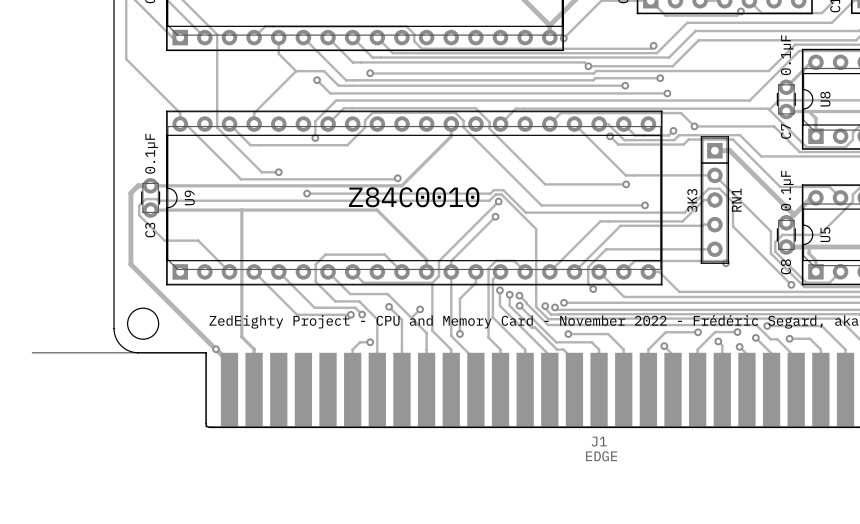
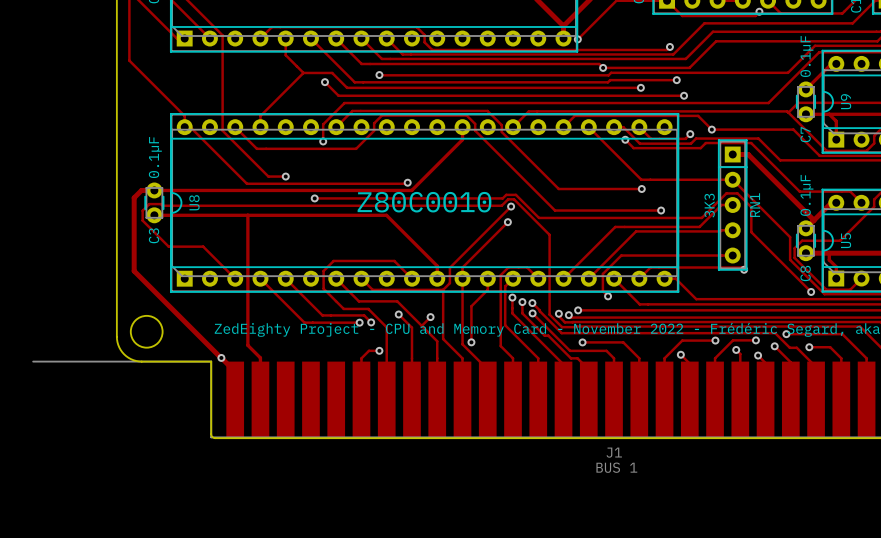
U8 name: U8 (825, 99) -> U9 (846, 101)
U9 name: U9 (189, 197) -> U8 (194, 202)
U9 value: Z84C0010 (414, 197) -> Z80C0010 (424, 202)
J1 value: EDGE (601, 456) -> BUS 1 (616, 467)

